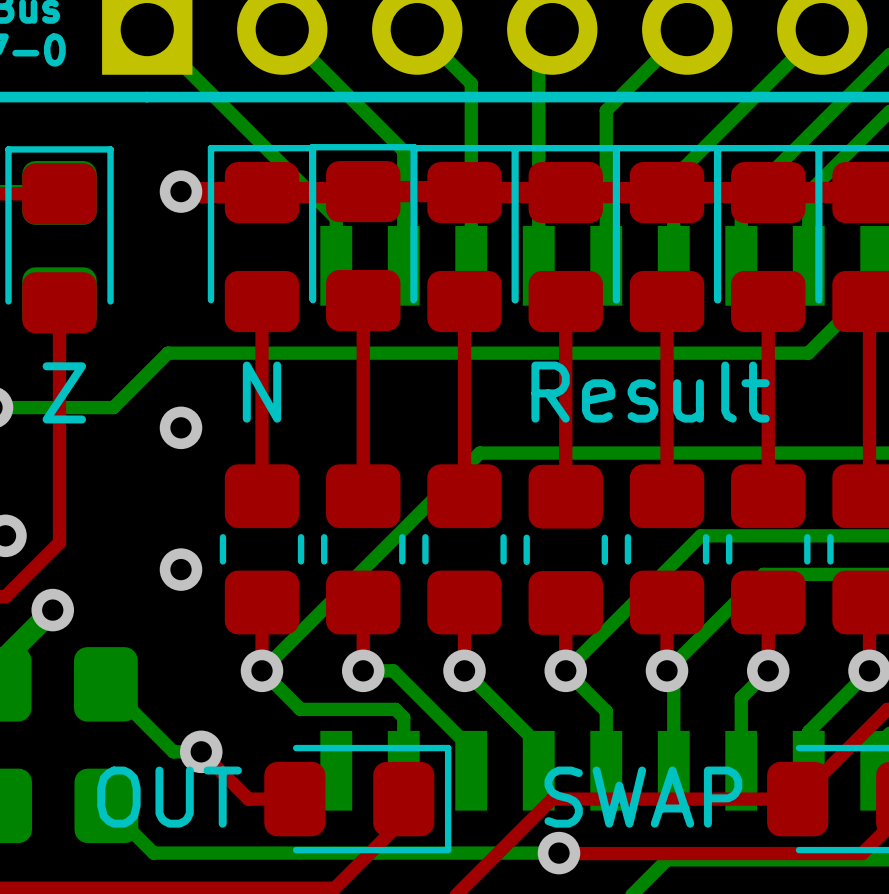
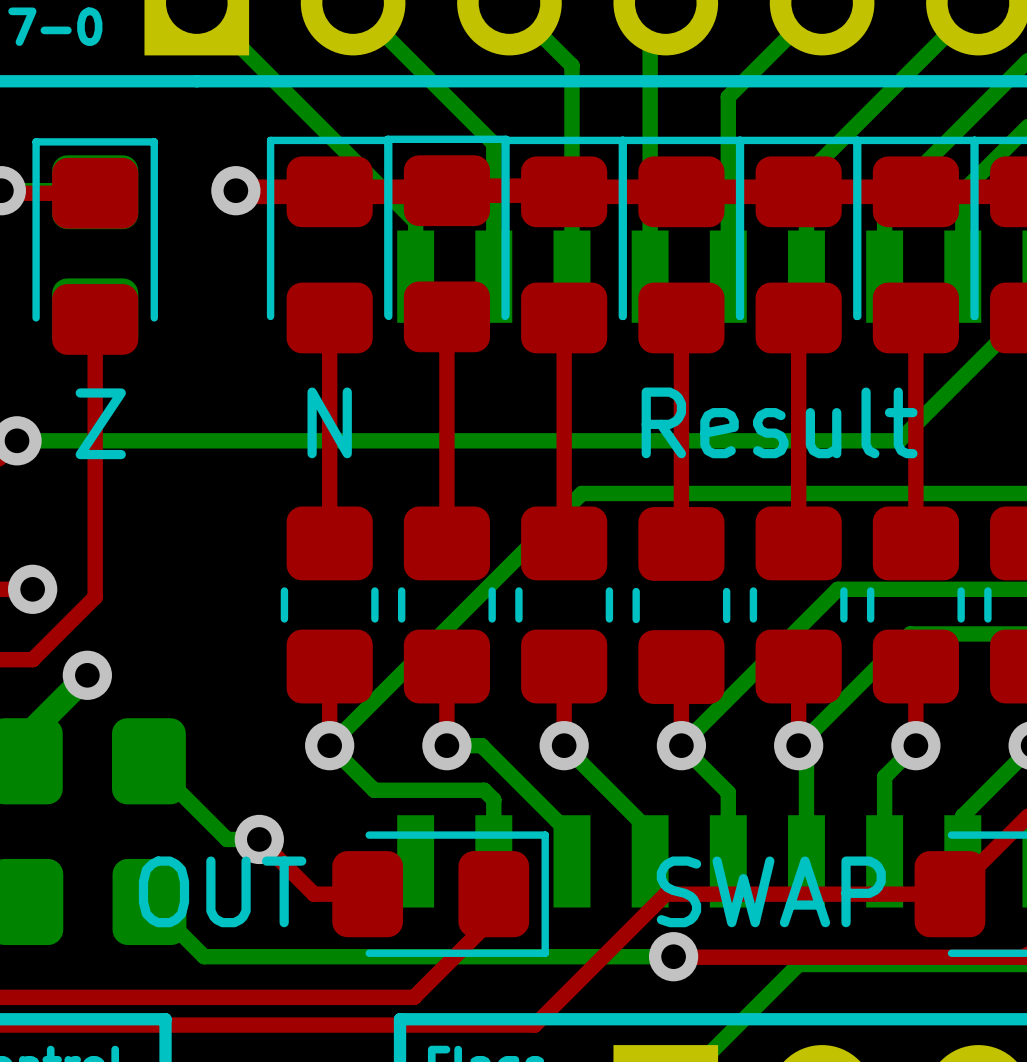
bottom track: (808, 353) (167, 353) (113, 407) -> (962, 377) (899, 440) (157, 440)
via: (181, 427) -> none
via: (181, 569) -> none

